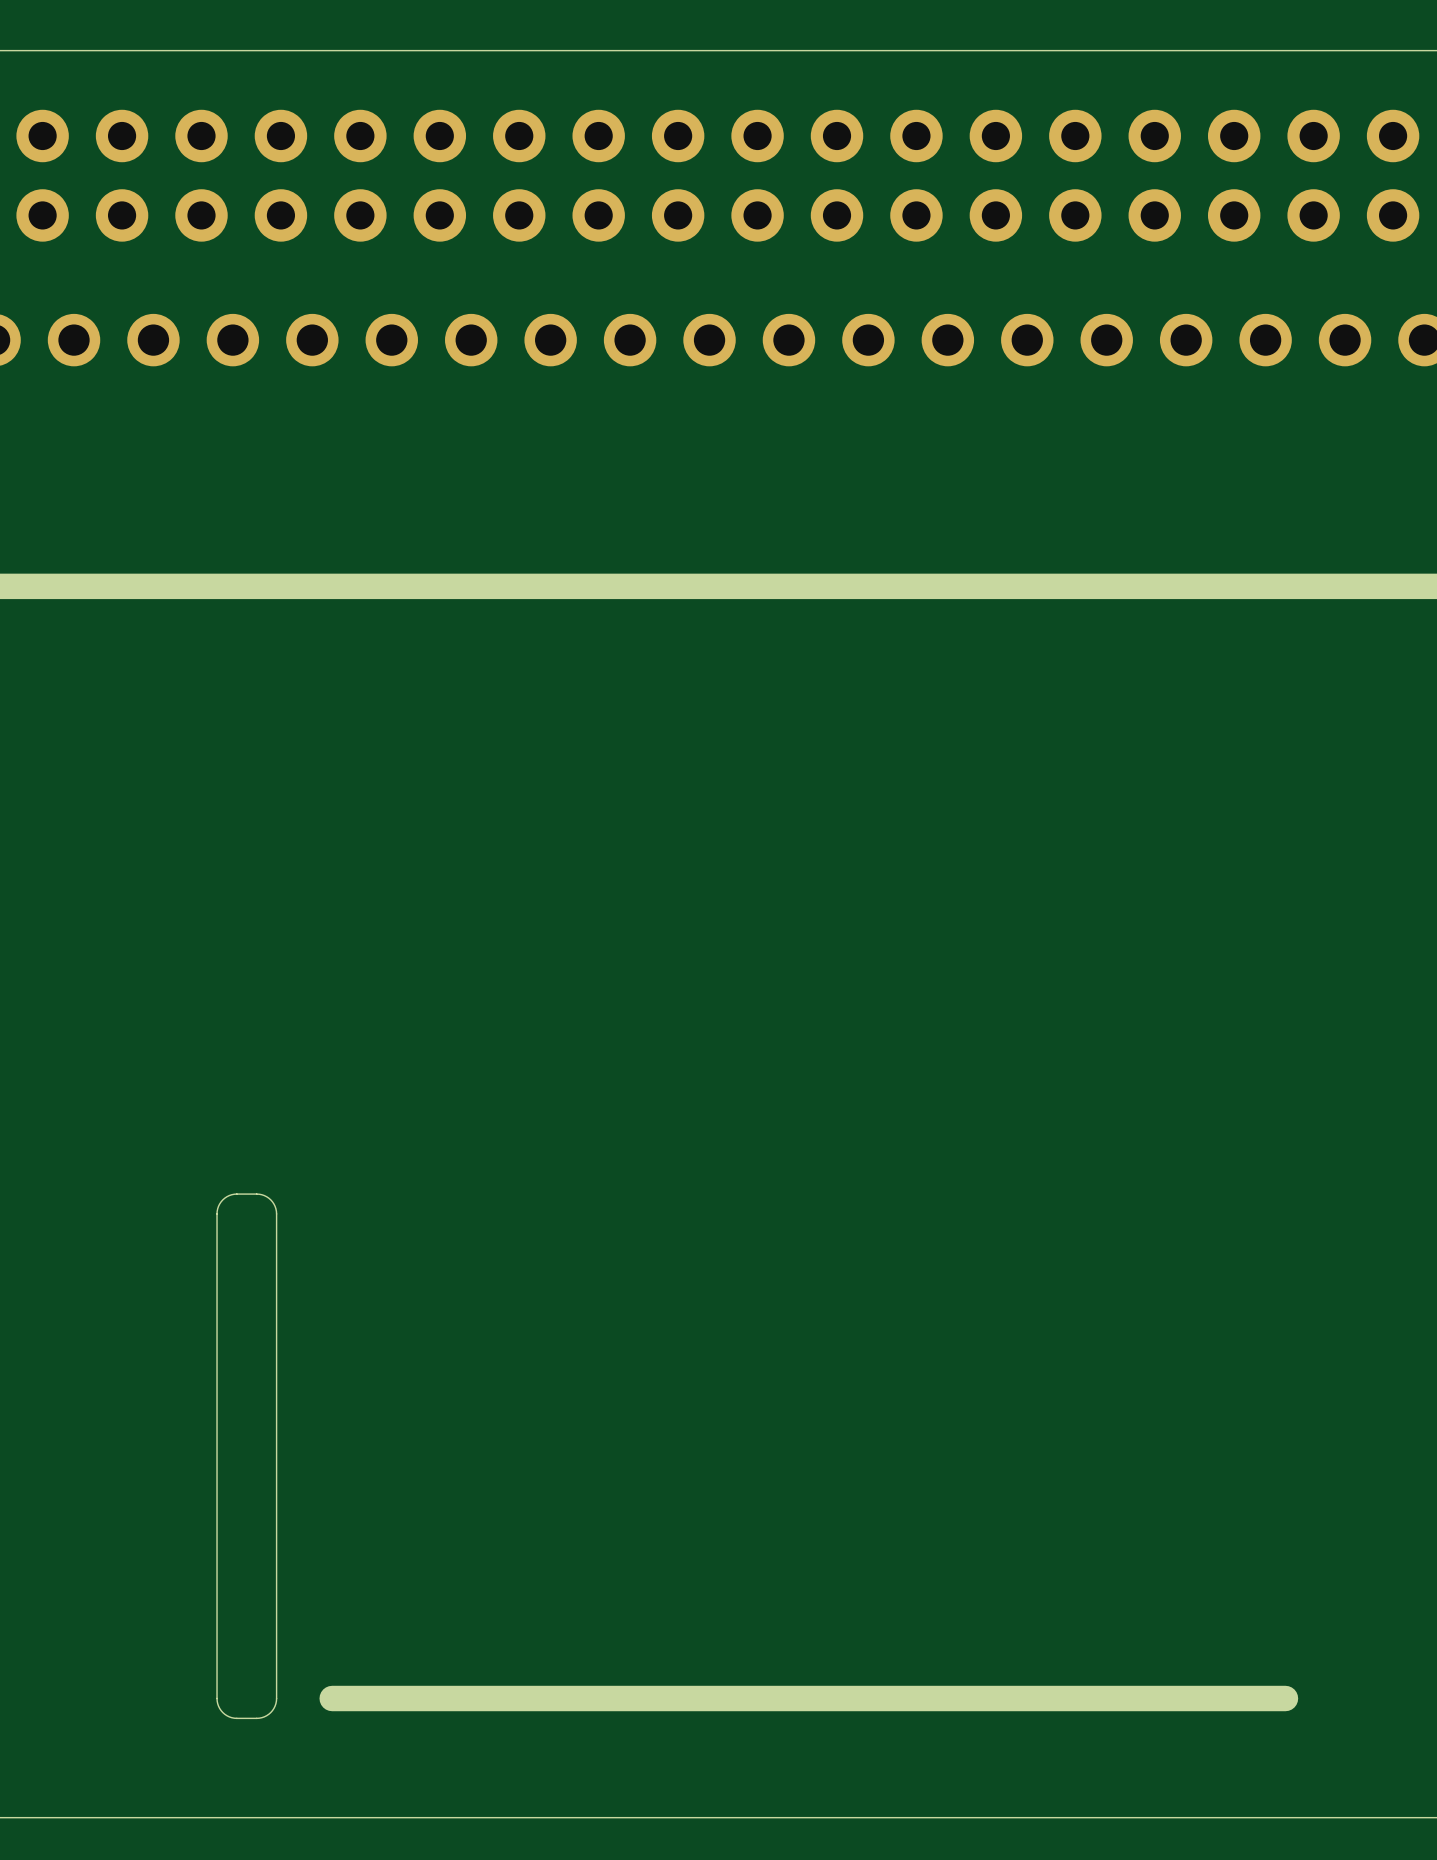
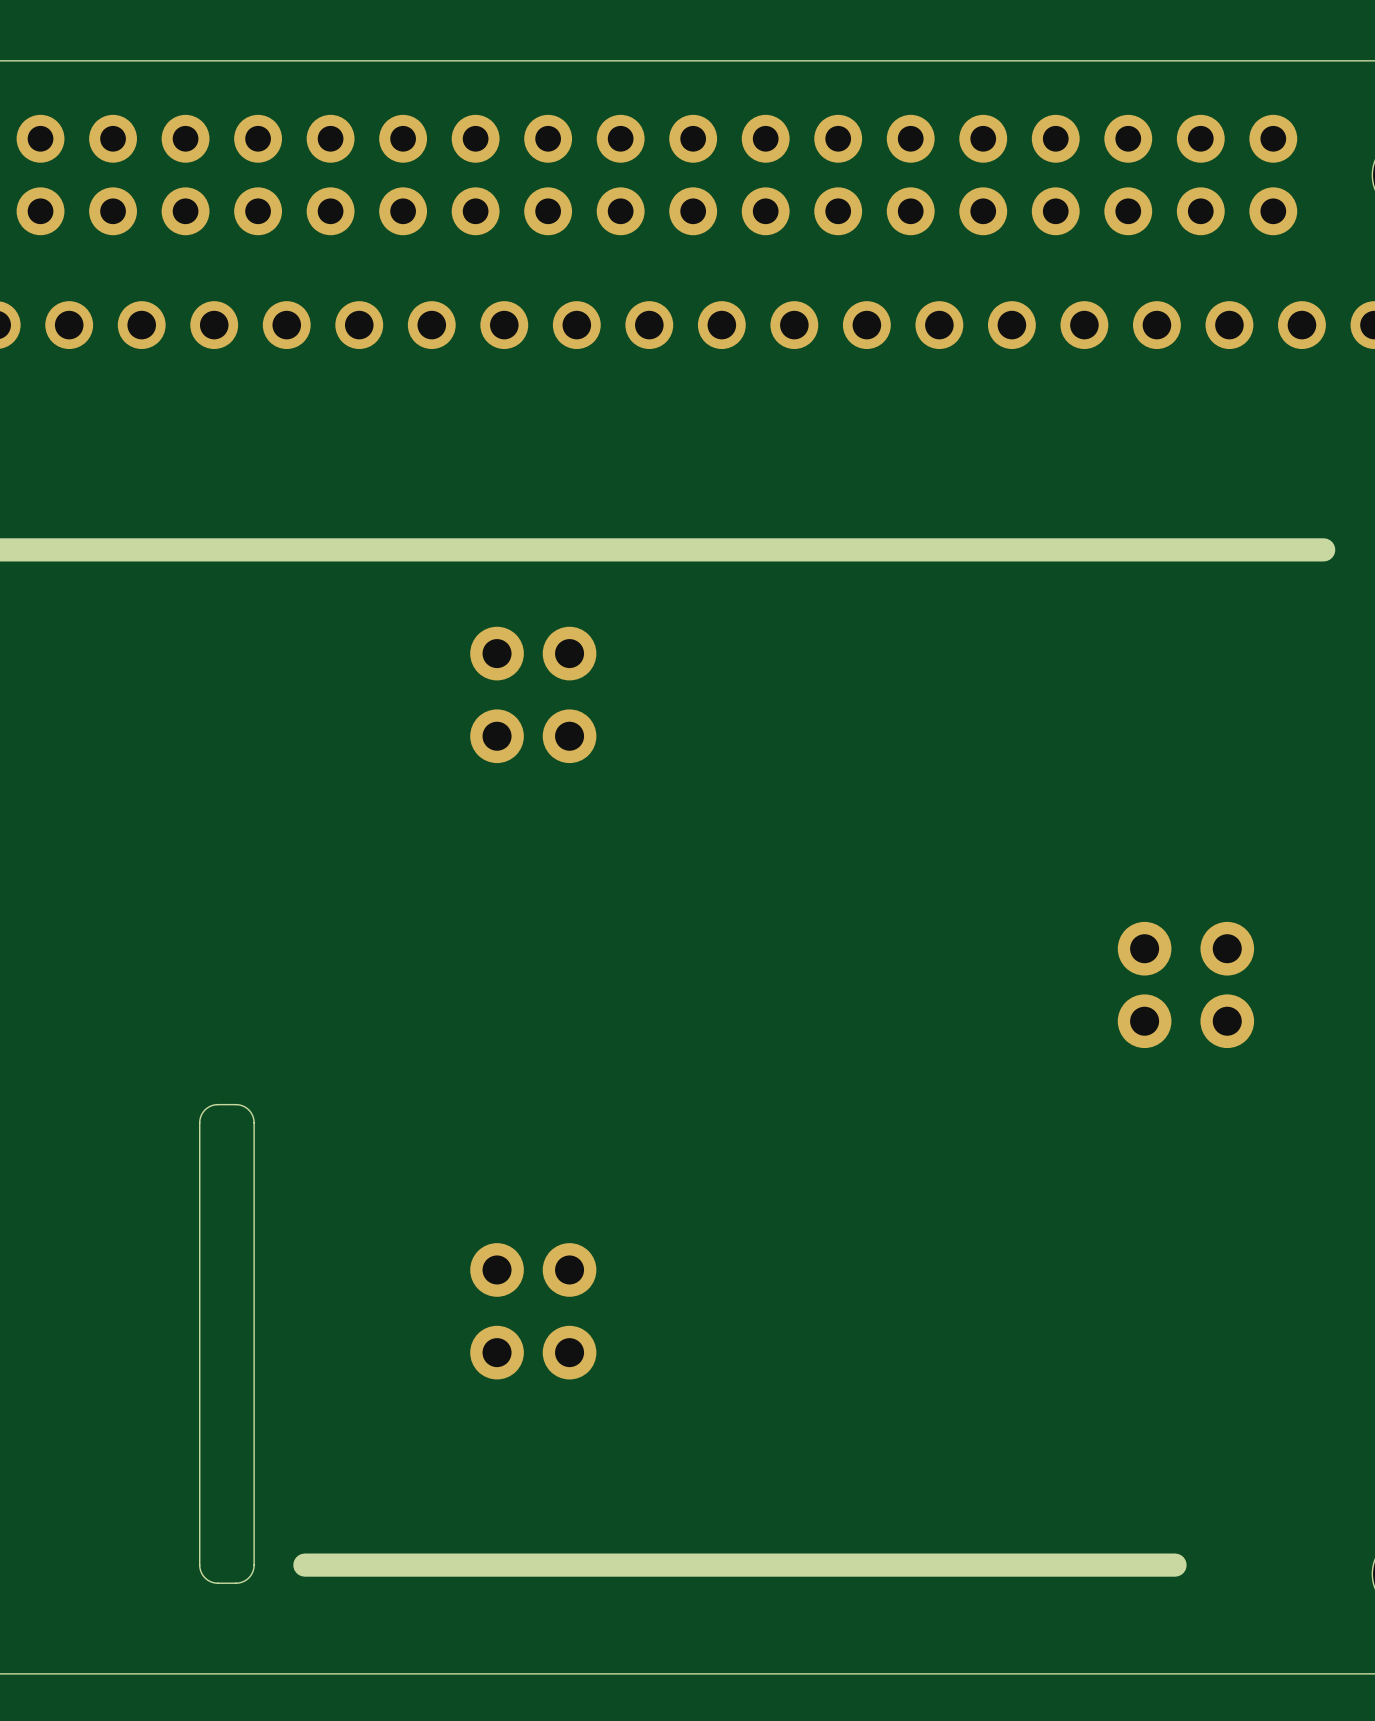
part: none -> (497, 694)
part: none -> (569, 694)
part: none -> (1185, 948)
part: none -> (1185, 1021)
part: none -> (497, 1311)
part: none -> (569, 1311)

